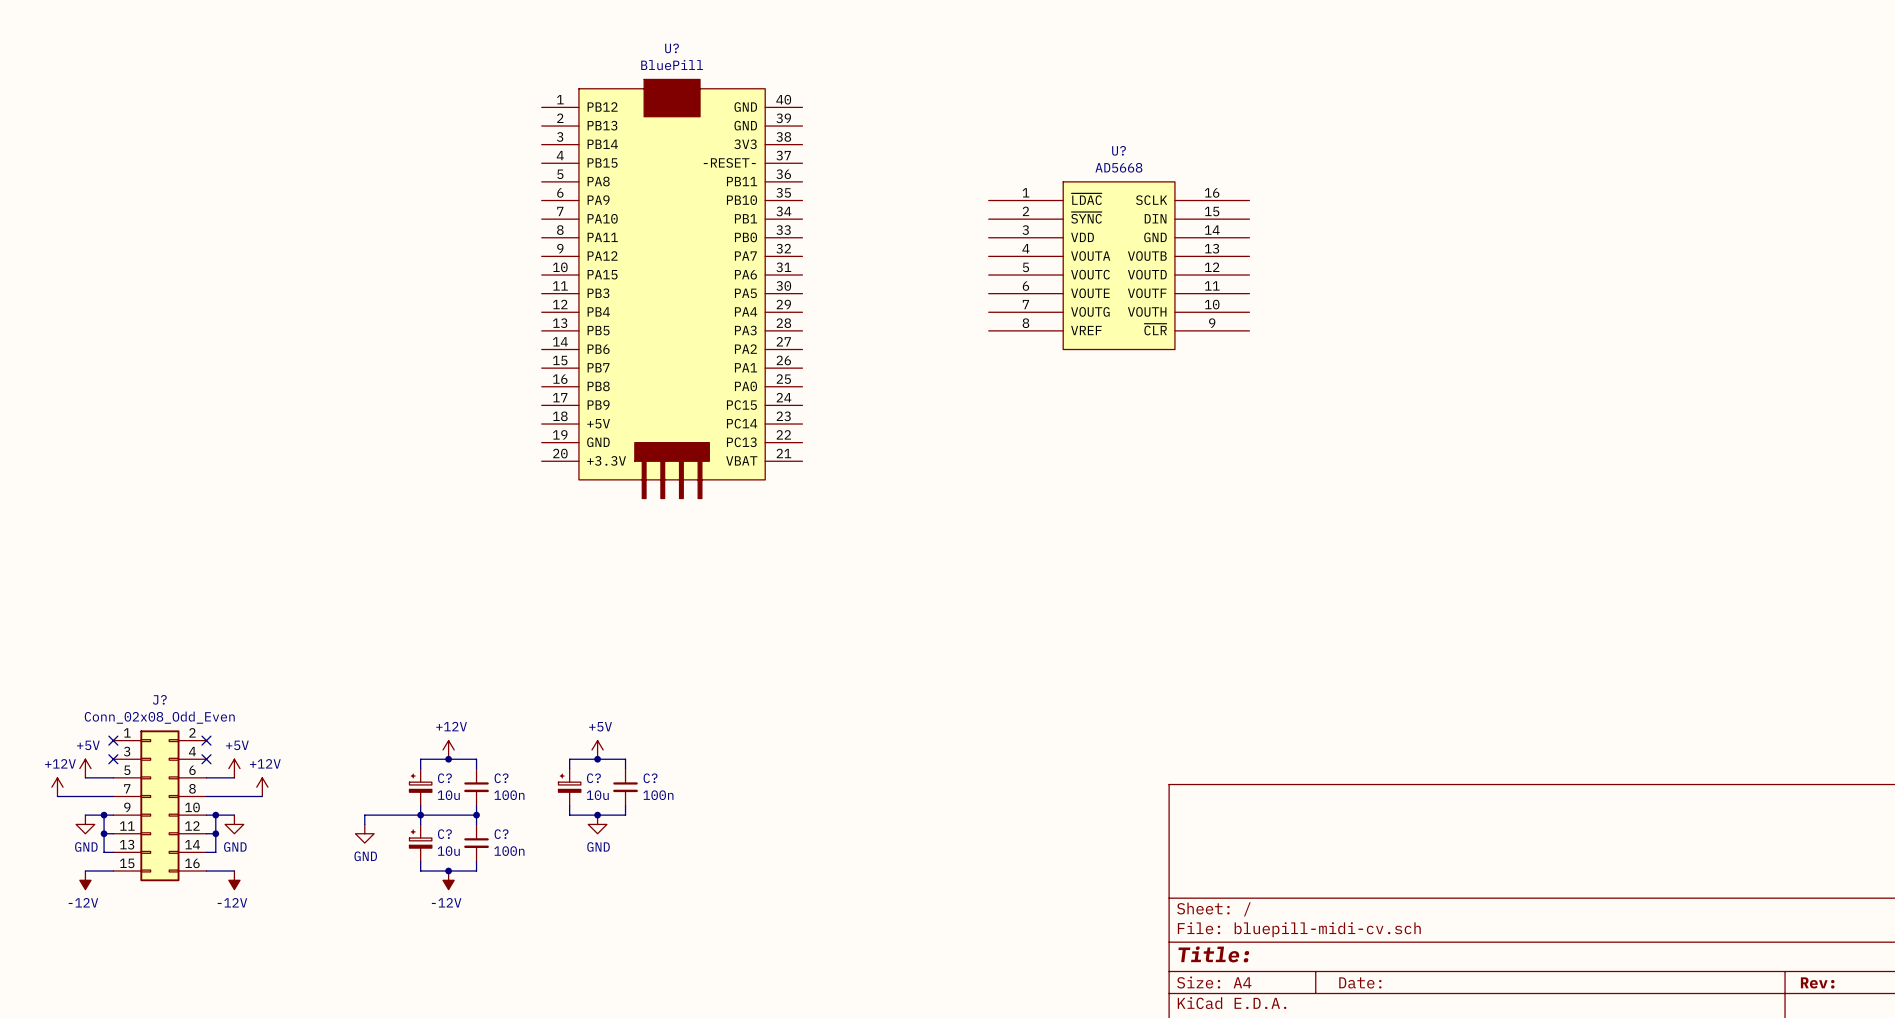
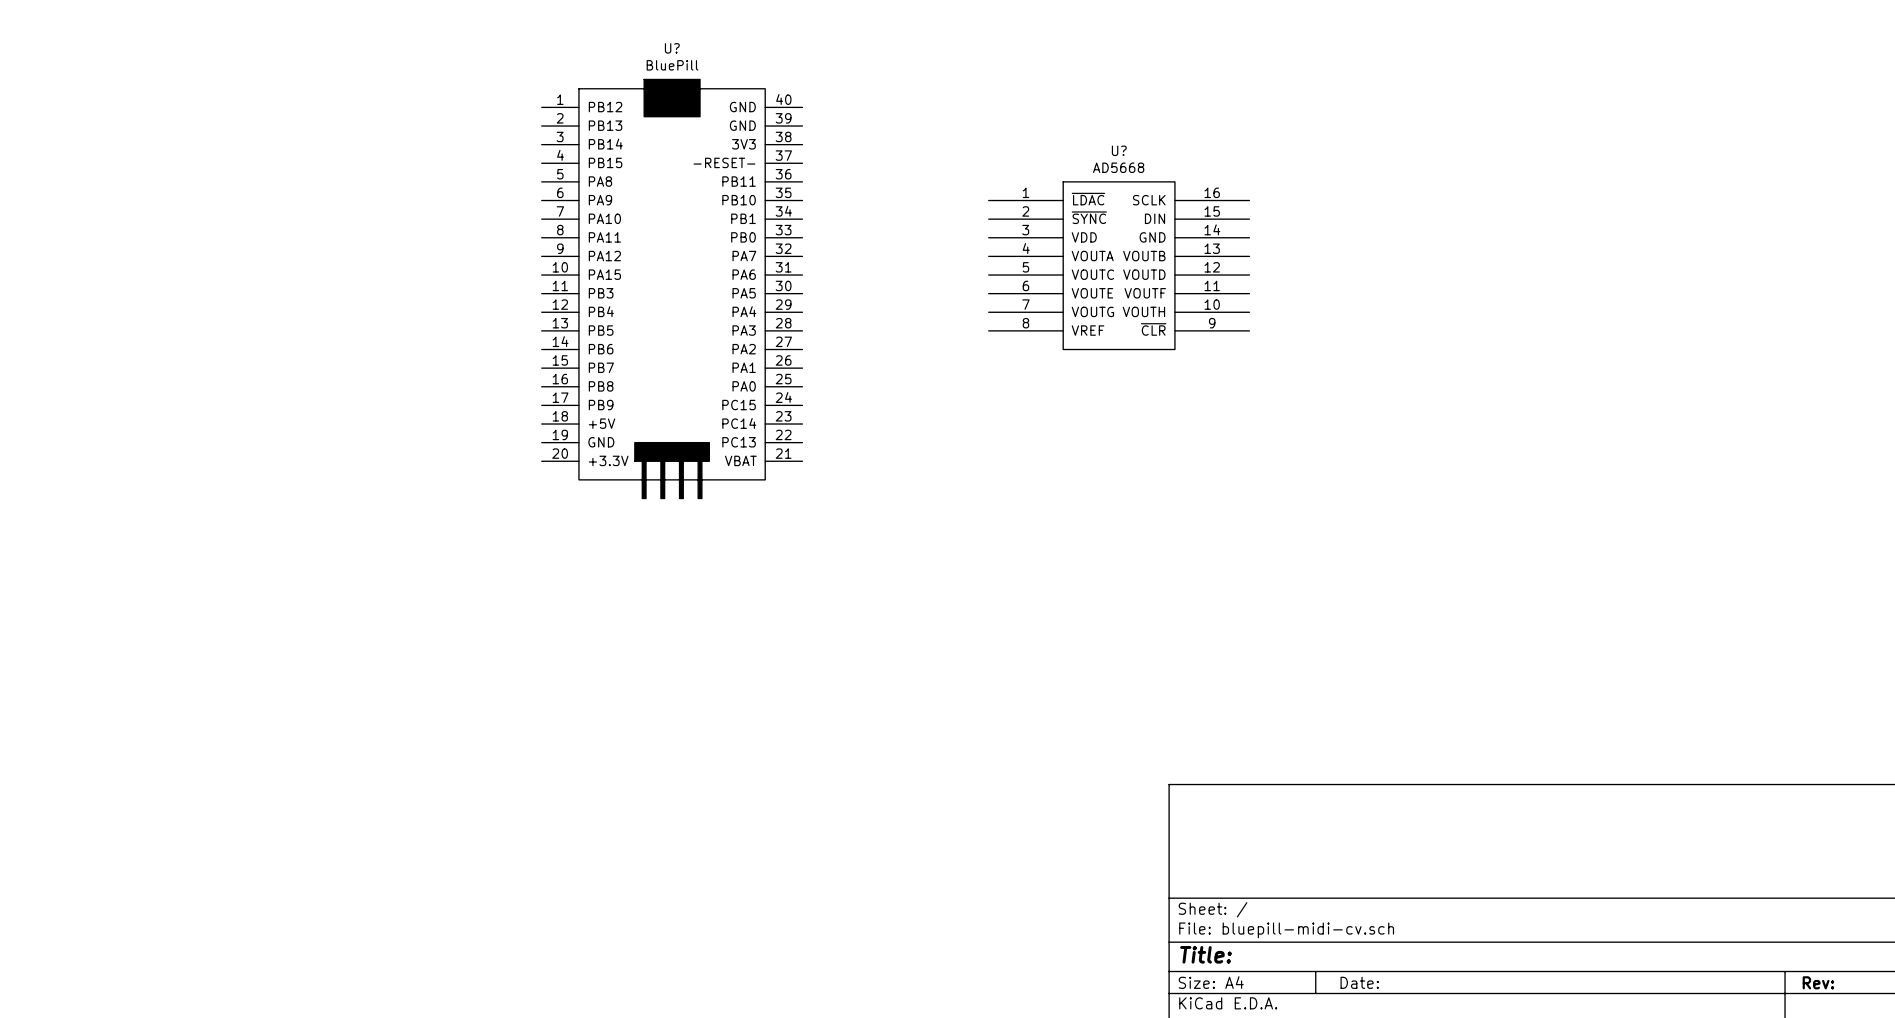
no-connect mark: (113, 740) -> none
no-connect mark: (206, 740) -> none
power symbol: +12V (448, 749) -> none
power symbol: +5V (597, 749) -> none
no-connect mark: (113, 759) -> none
no-connect mark: (206, 759) -> none
junction: (448, 759) -> none
junction: (597, 759) -> none
power symbol: +5V (85, 768) -> none
power symbol: +5V (234, 768) -> none
wire: (420, 768) (420, 759) (476, 759) (476, 768) -> none
wire: (569, 768) (569, 759) (625, 759) (625, 768) -> none
wire: (85, 777) (113, 777) -> none
wire: (206, 777) (234, 777) -> none
power symbol: +12V (57, 787) -> none
power symbol: +12V (262, 787) -> none
C?: 10u (420, 787) -> none
C?: 100n (476, 787) -> none
C?: 10u (569, 787) -> none
C?: 100n (625, 787) -> none
wire: (57, 796) (113, 796) -> none
wire: (206, 796) (262, 796) -> none
J?: Conn_02x08_Odd_Even (159, 805) -> none
wire: (420, 805) (420, 824) -> none
wire: (476, 805) (476, 824) -> none
wire: (569, 805) (569, 815) (625, 815) (625, 805) -> none
wire: (85, 815) (113, 815) -> none
wire: (104, 815) (104, 852) (113, 852) -> none
junction: (104, 815) -> none
wire: (206, 815) (234, 815) -> none
wire: (215, 815) (215, 852) (206, 852) -> none
junction: (215, 815) -> none
junction: (420, 815) -> none
wire: (476, 815) (364, 815) (364, 824) -> none
junction: (476, 815) -> none
junction: (597, 815) -> none
power symbol: GND (85, 824) -> none
power symbol: GND (234, 824) -> none
power symbol: GND (597, 824) -> none
wire: (104, 833) (113, 833) -> none
junction: (104, 833) -> none
wire: (206, 833) (215, 833) -> none
junction: (215, 833) -> none
power symbol: GND (364, 833) -> none
C?: 10u (420, 843) -> none
C?: 100n (476, 843) -> none
wire: (420, 861) (420, 870) (476, 870) (476, 861) -> none
wire: (85, 870) (113, 870) -> none
wire: (206, 870) (234, 870) -> none
junction: (448, 870) -> none
power symbol: -12V (85, 880) -> none
power symbol: -12V (234, 880) -> none
power symbol: -12V (448, 880) -> none

